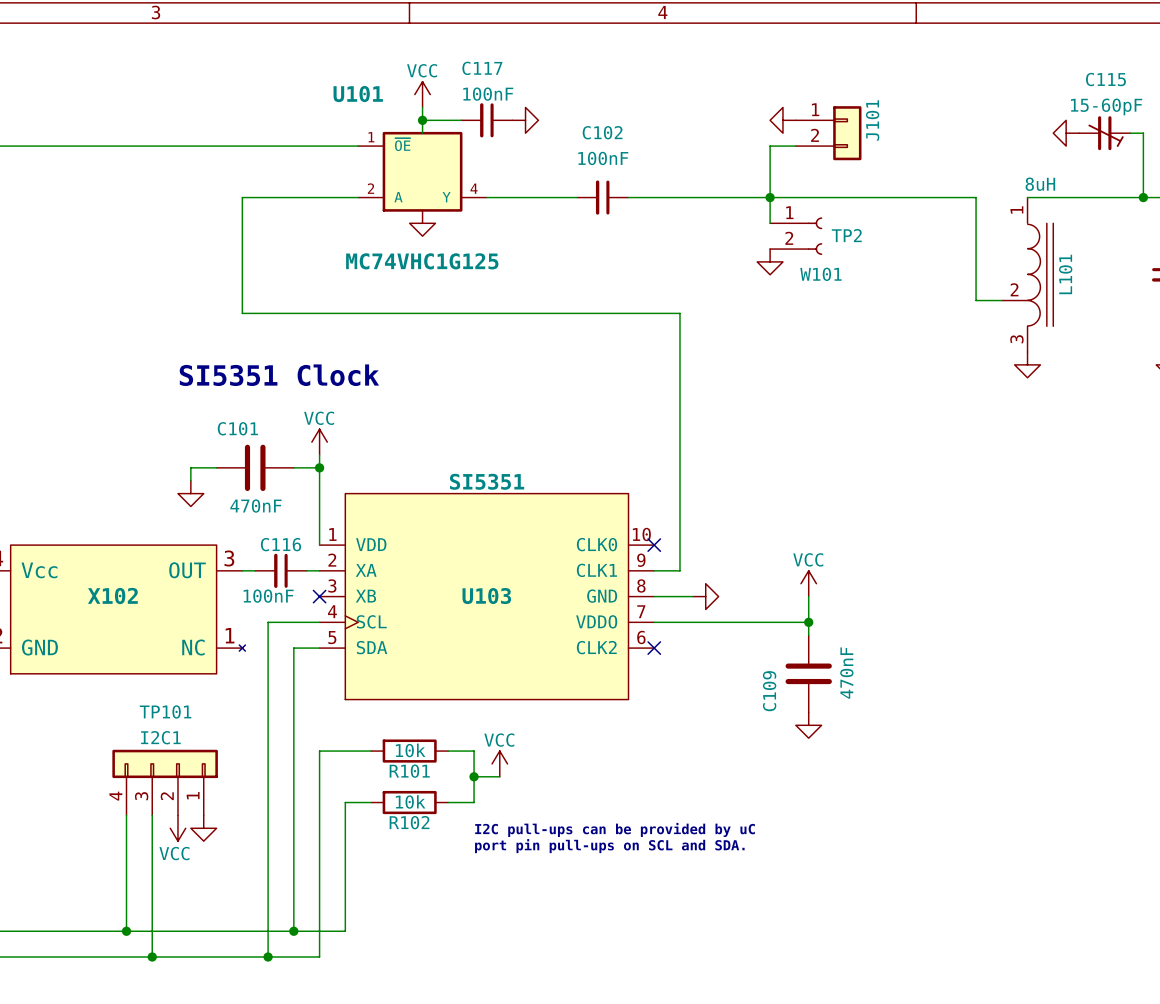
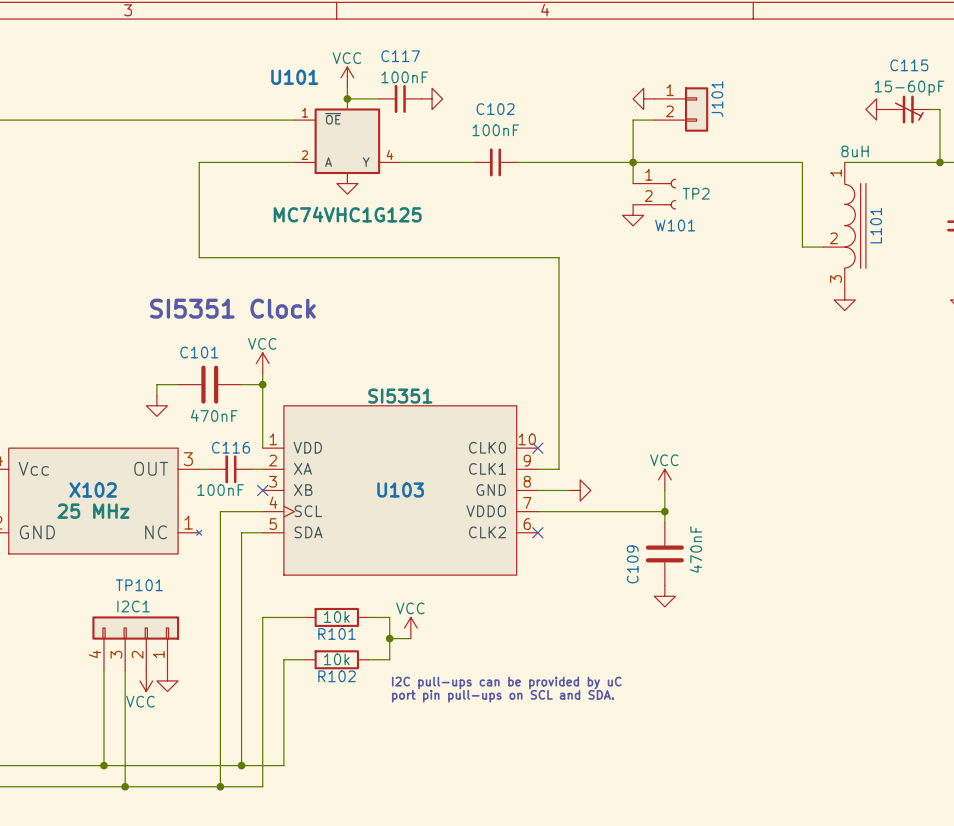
X102 value: none -> 25 MHz (93, 511)

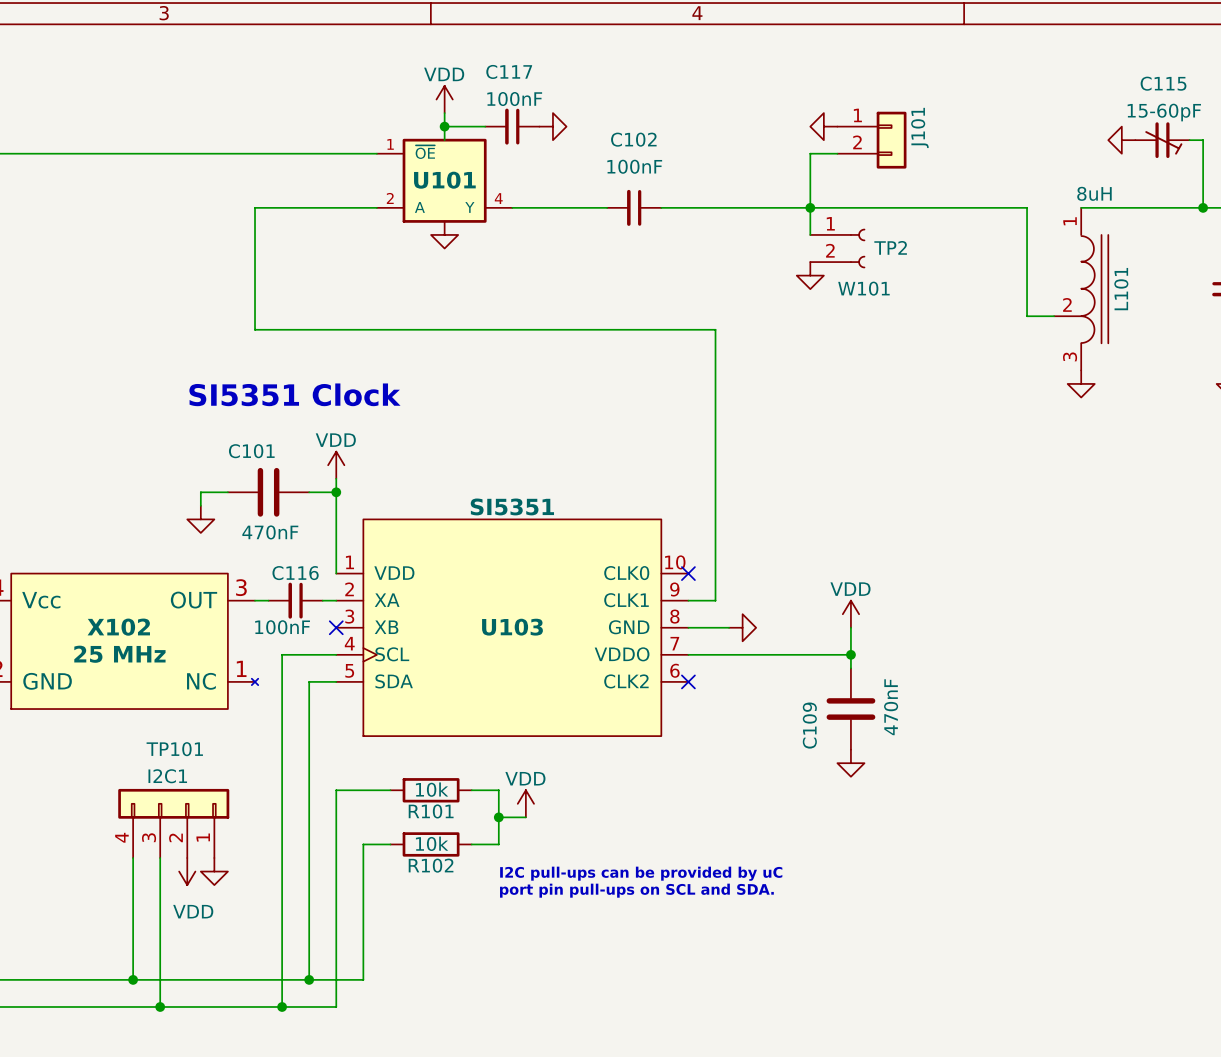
U101 name position: U101 (294, 77) -> U101 (444, 180)
power symbol: VCC (347, 77) -> VDD (444, 99)
U101 value: MC74VHC1G125 (347, 214) -> none
power symbol: VCC (262, 363) -> VDD (336, 465)
power symbol: VCC (664, 479) -> VDD (850, 614)
power symbol: VCC (410, 628) -> VDD (525, 803)
power symbol: VCC (146, 680) -> VDD (187, 871)

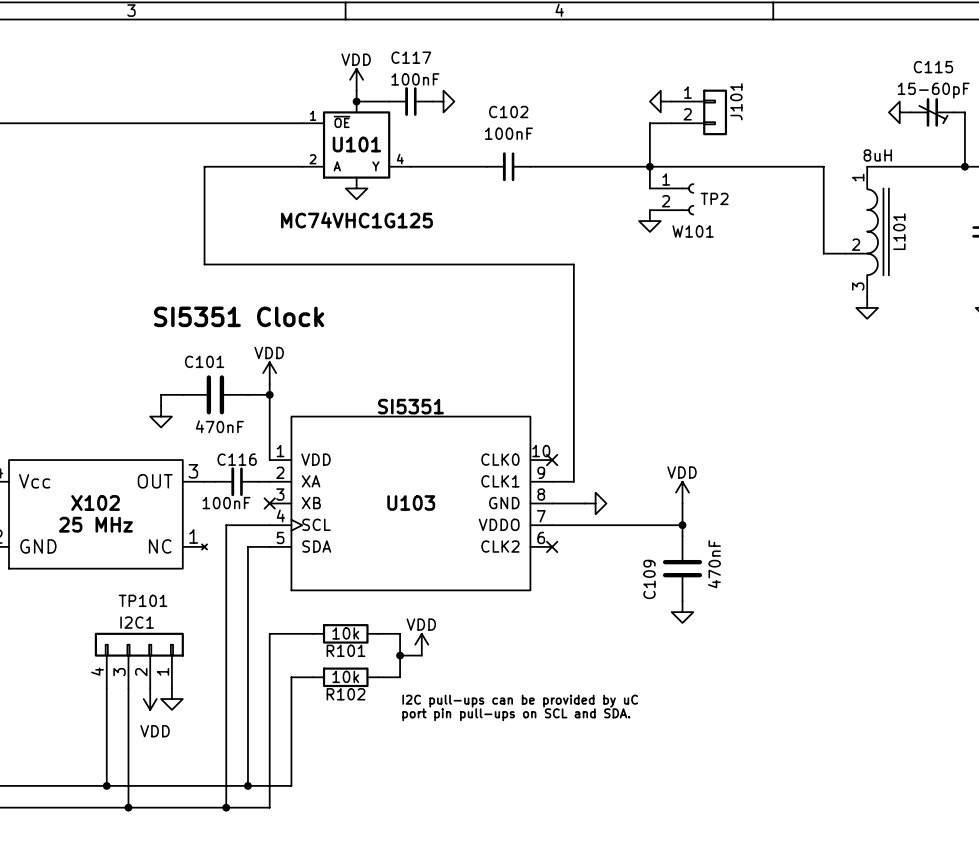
U101 value: none -> MC74VHC1G125 (356, 220)

